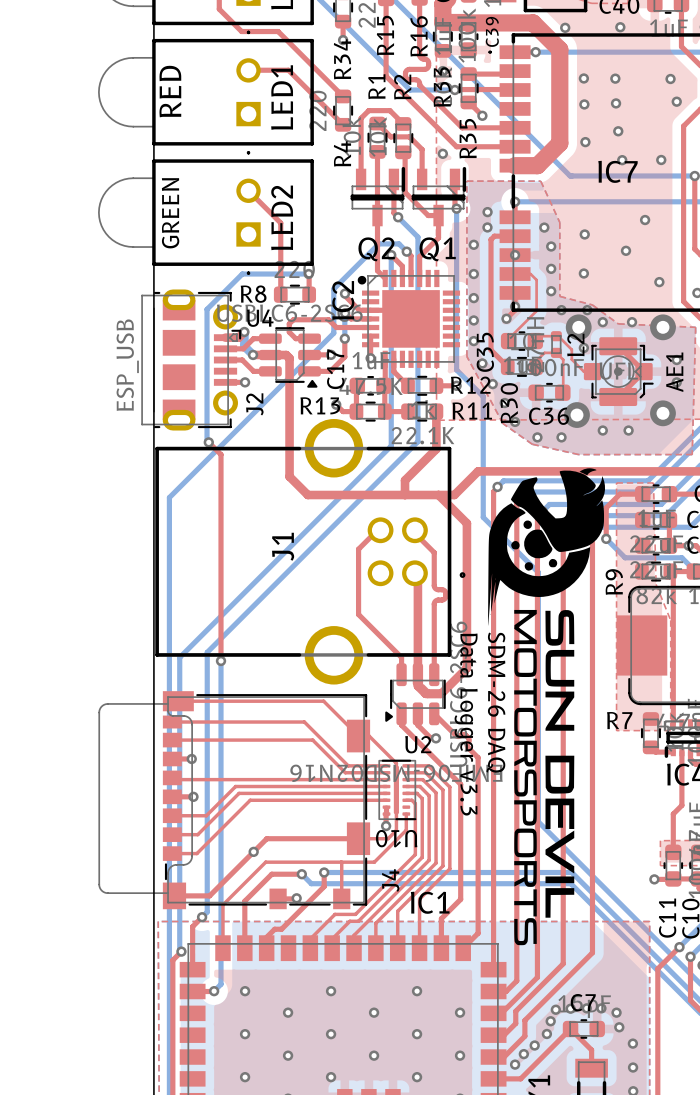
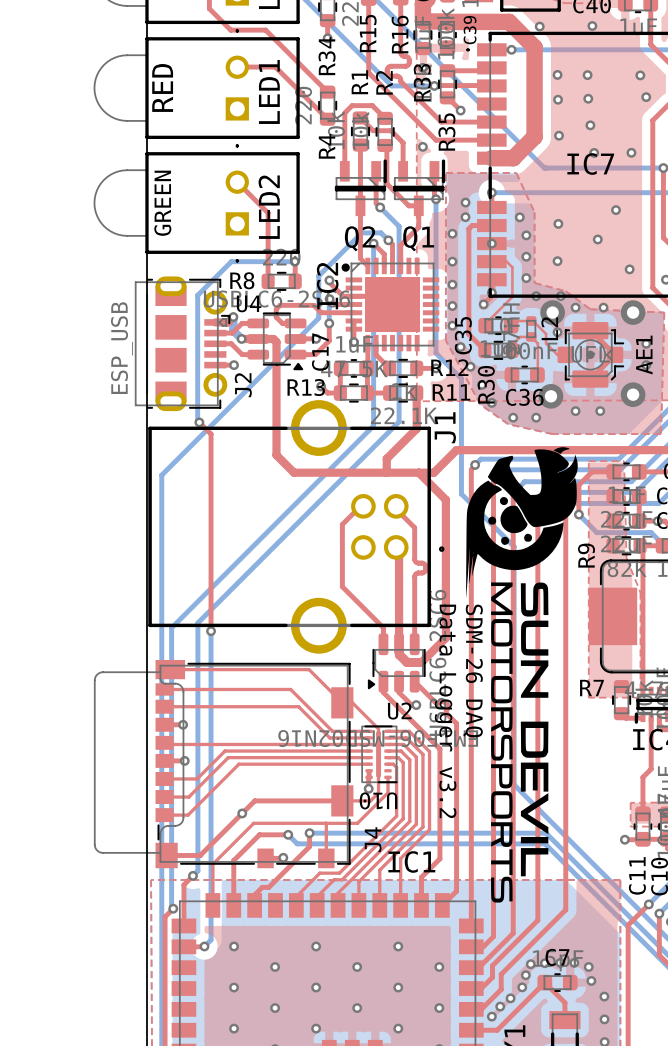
J1 name position: J1 (283, 546) -> J1 (445, 427)
text: Data Logger v3.3 (466, 724) -> Data Logger v3.2 (445, 711)

